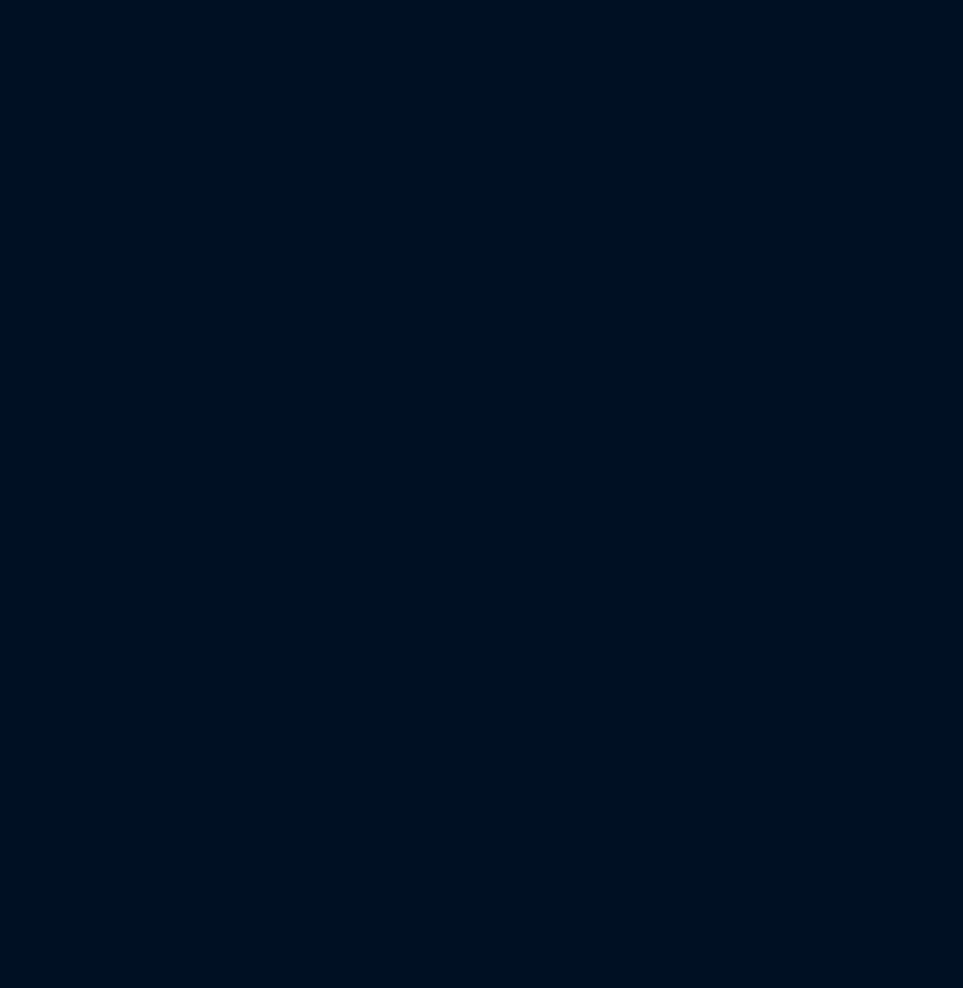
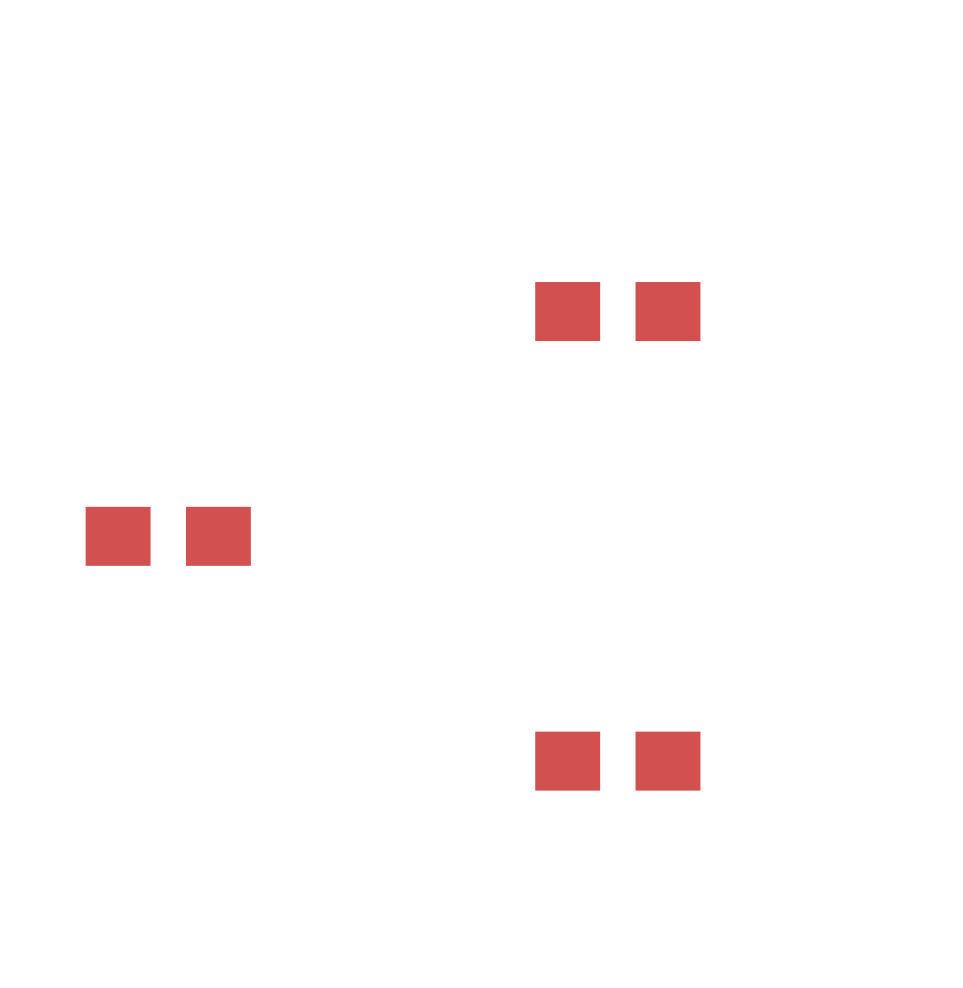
part: none -> (617, 311)
part: none -> (168, 536)
part: none -> (617, 761)

